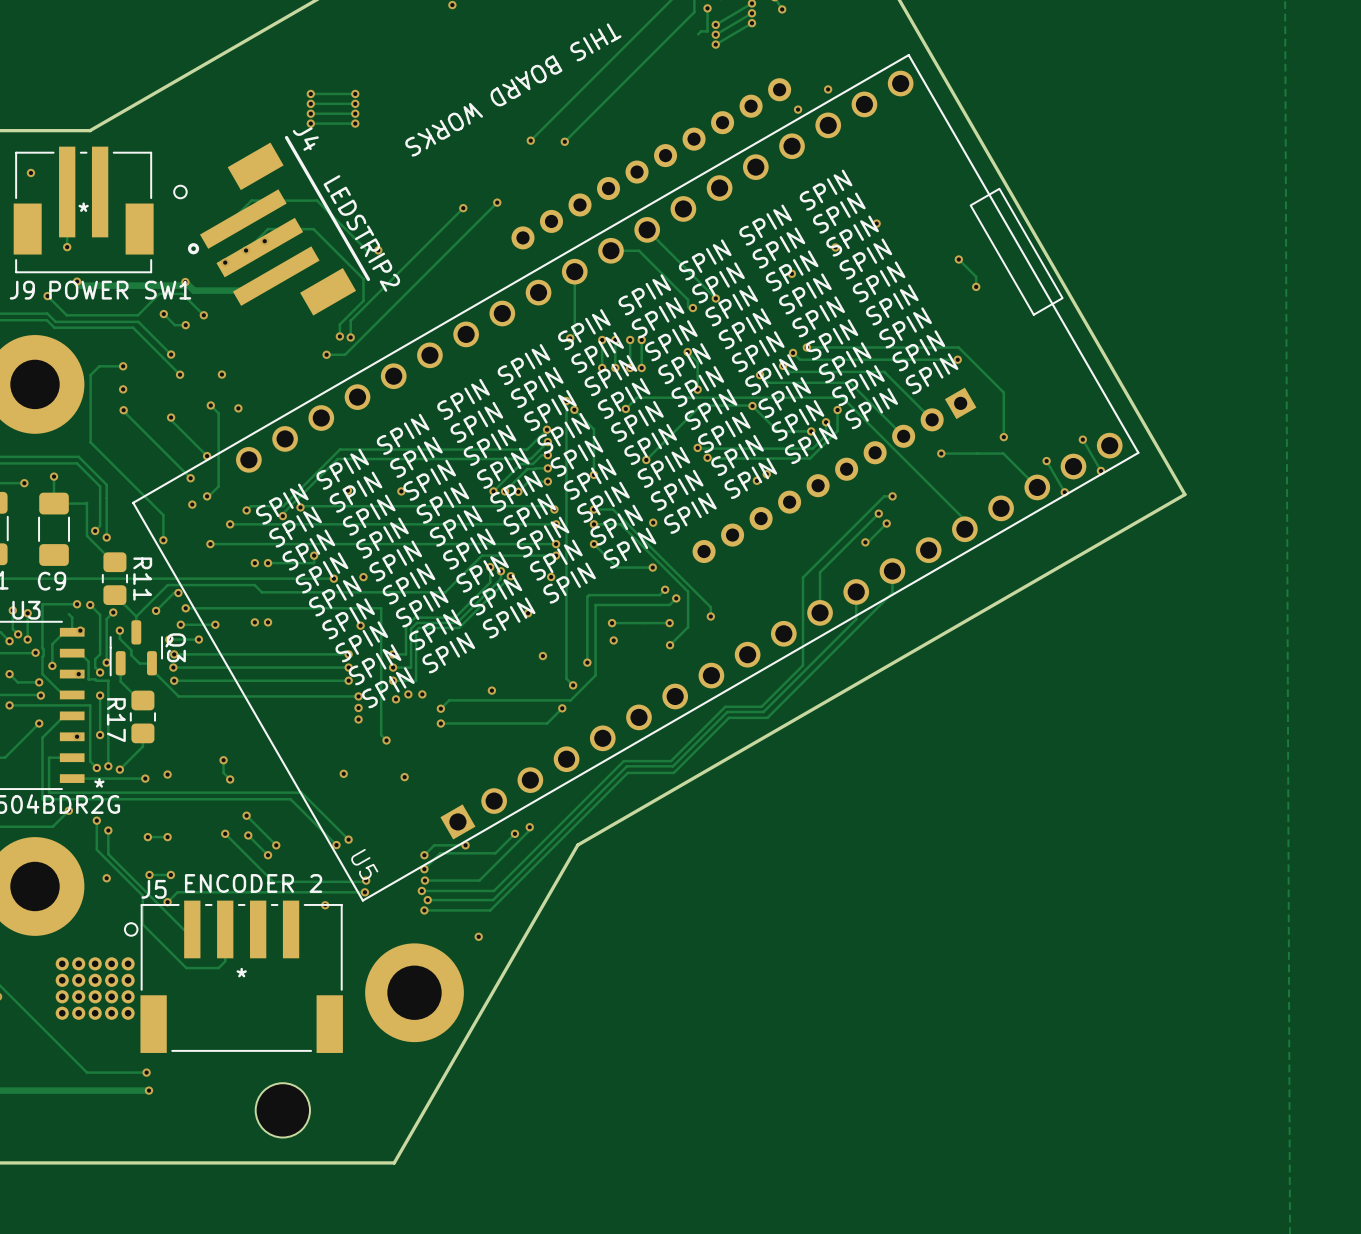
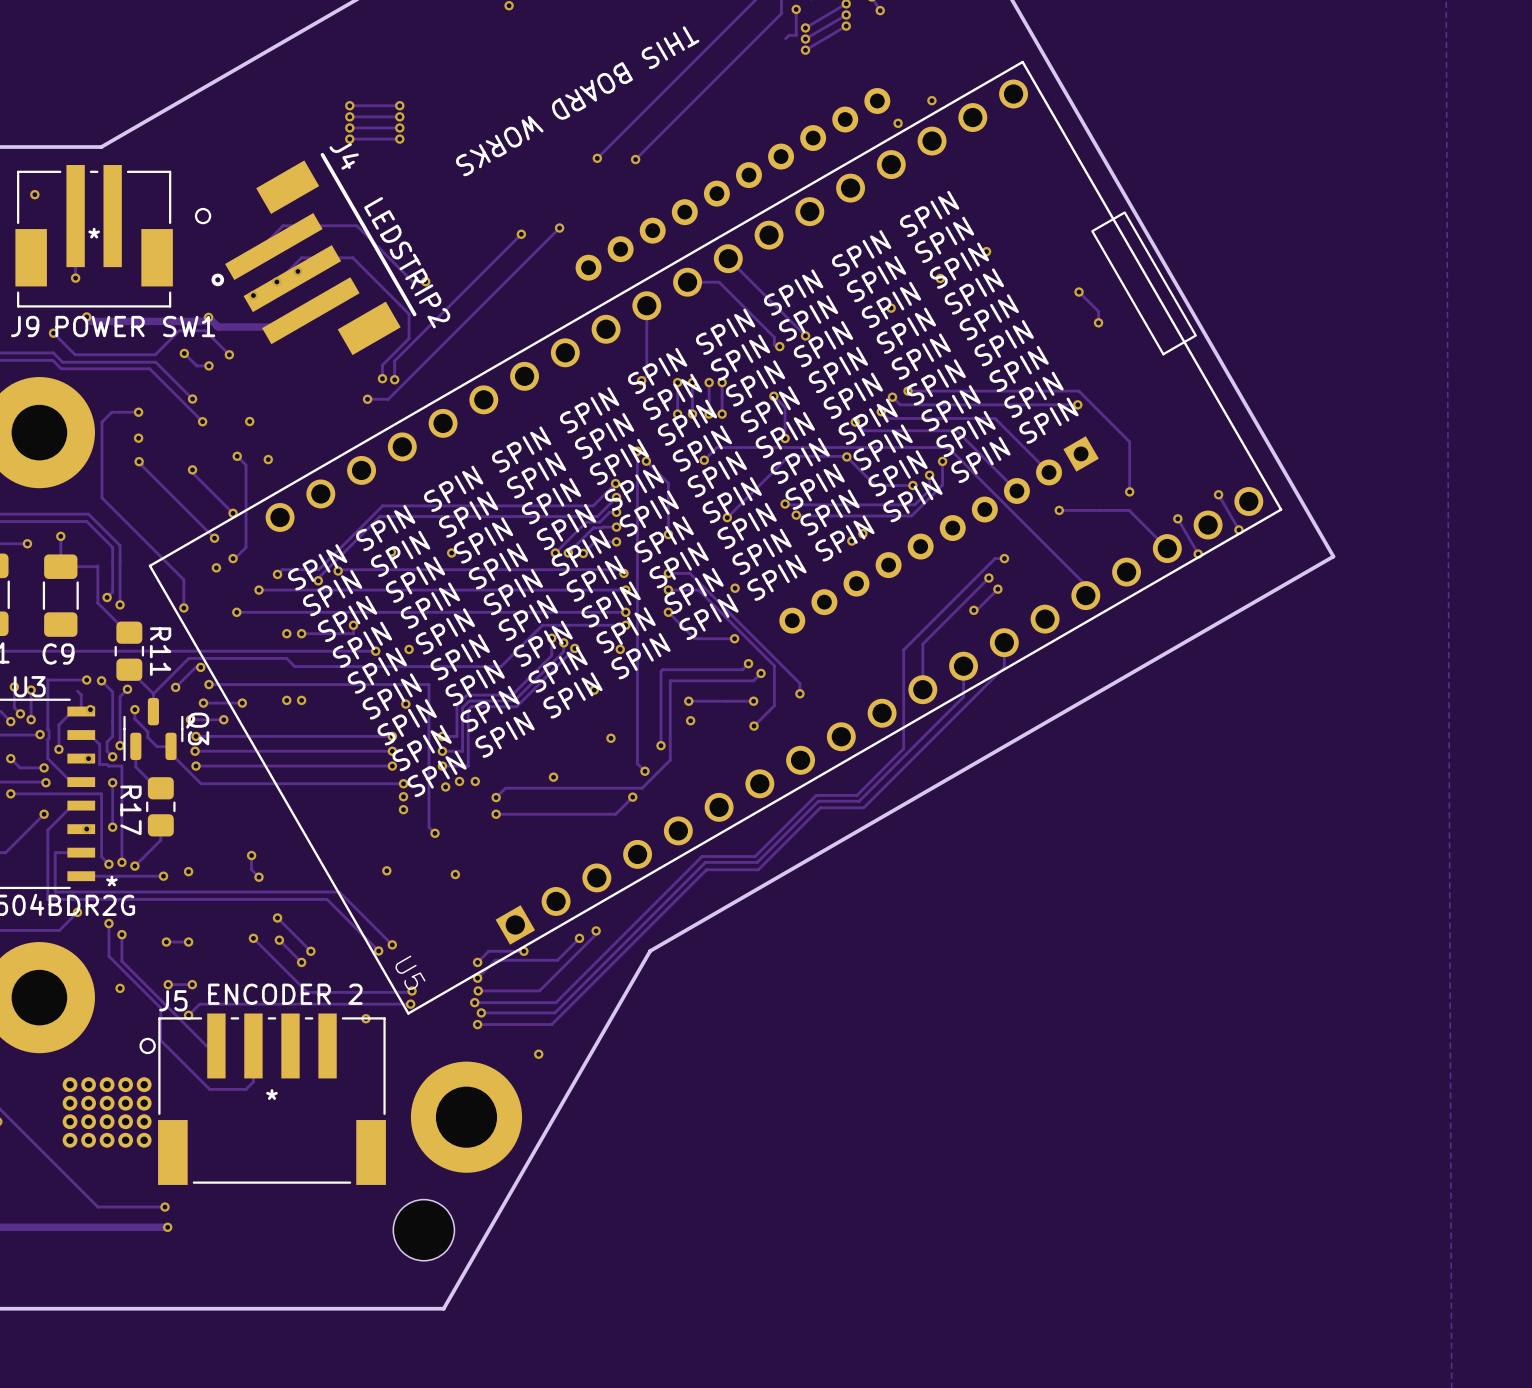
part position: (282, 1110) -> (423, 1230)

